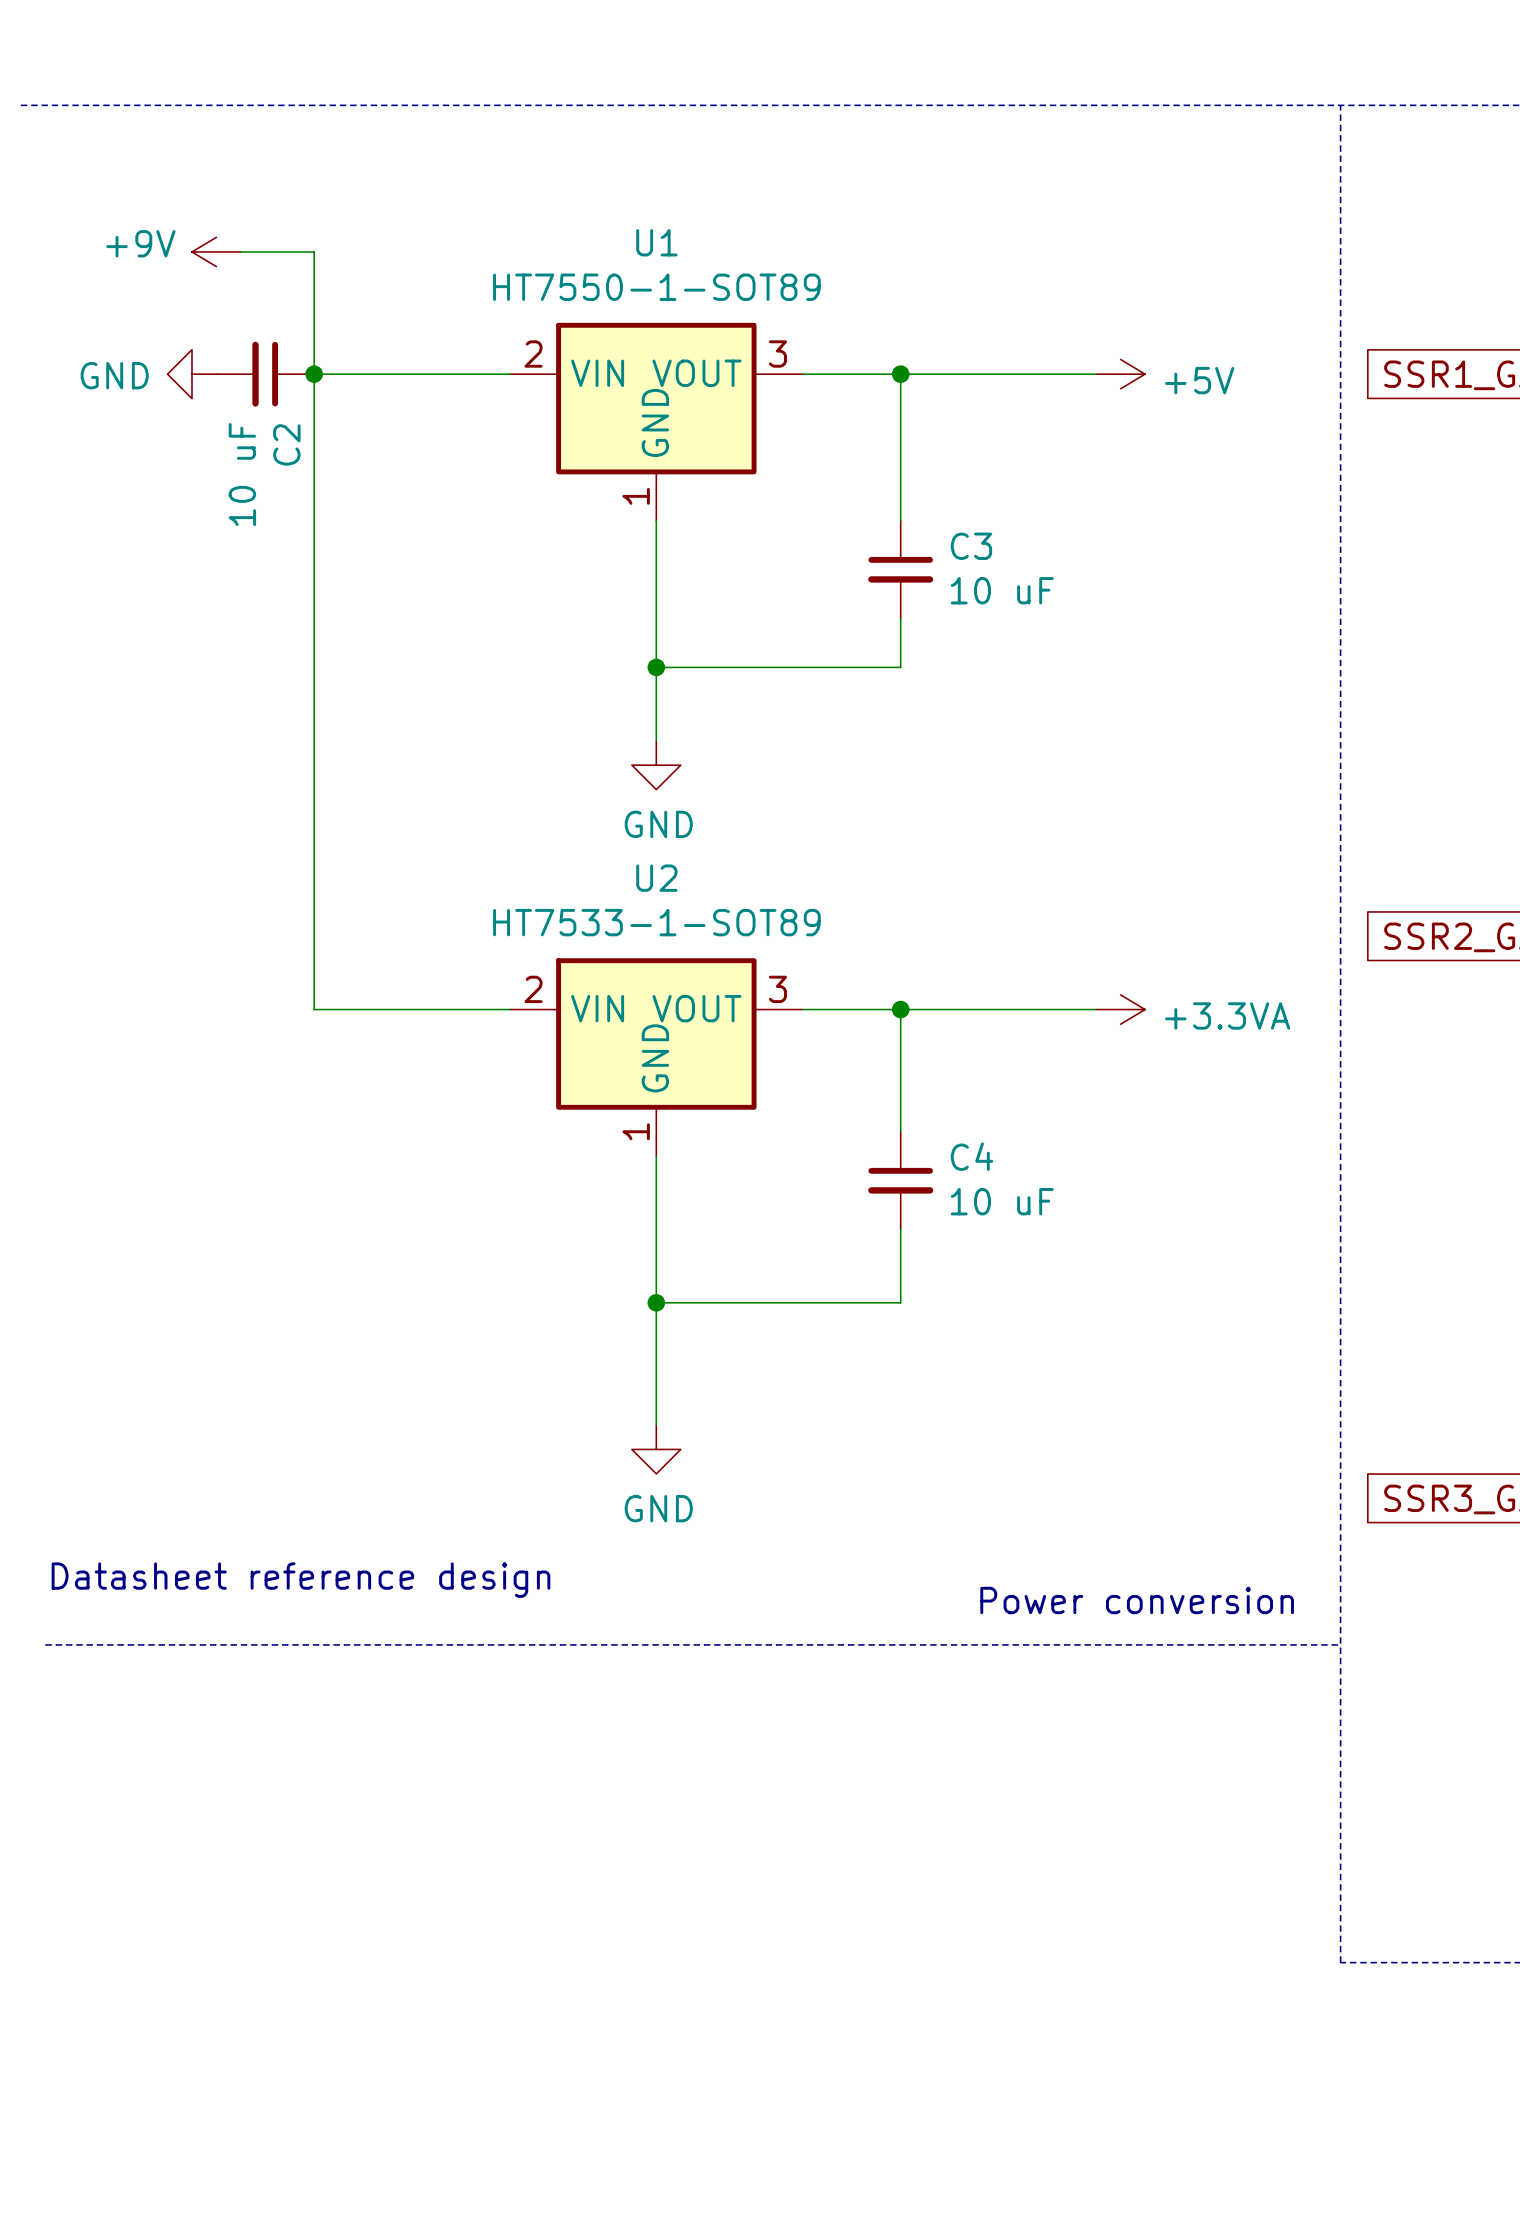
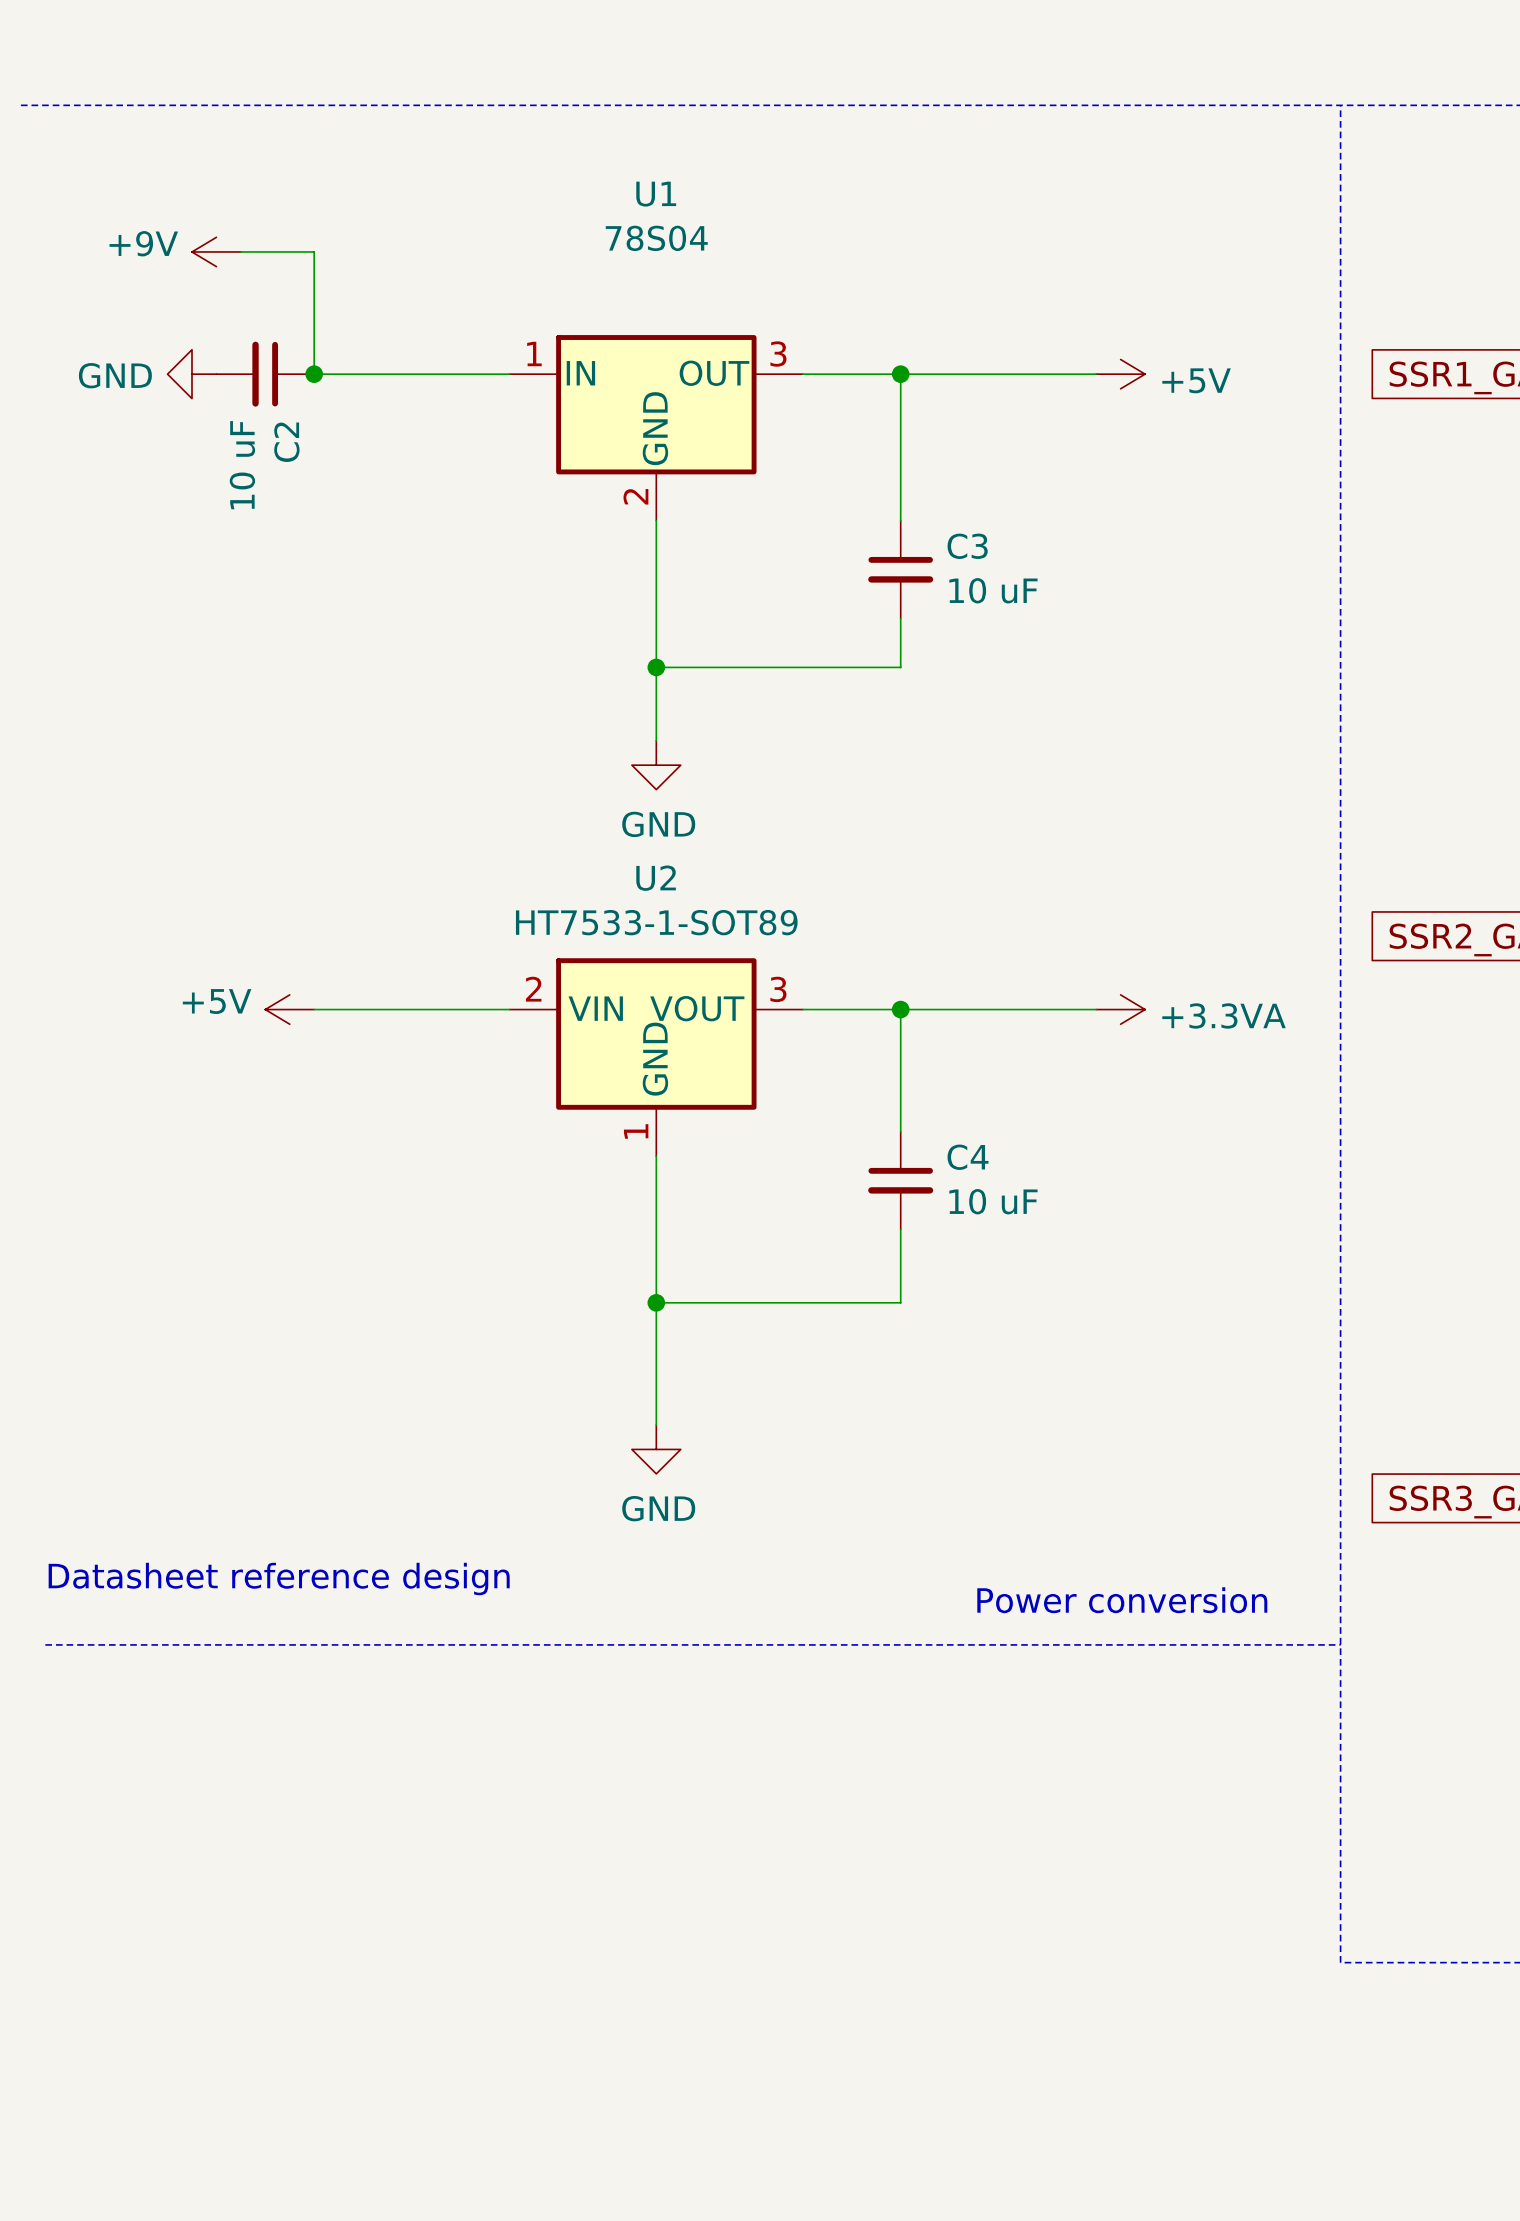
U1 name position: U1 (656, 242) -> U1 (656, 194)
U1 value: HT7550-1-SOT89 (656, 287) -> 78S04 (656, 238)
U1 symbol: [509, 322, 803, 521] -> [509, 335, 803, 521]
wire: (314, 374) (314, 1009) -> none
power symbol: none -> +5V (289, 1009)

